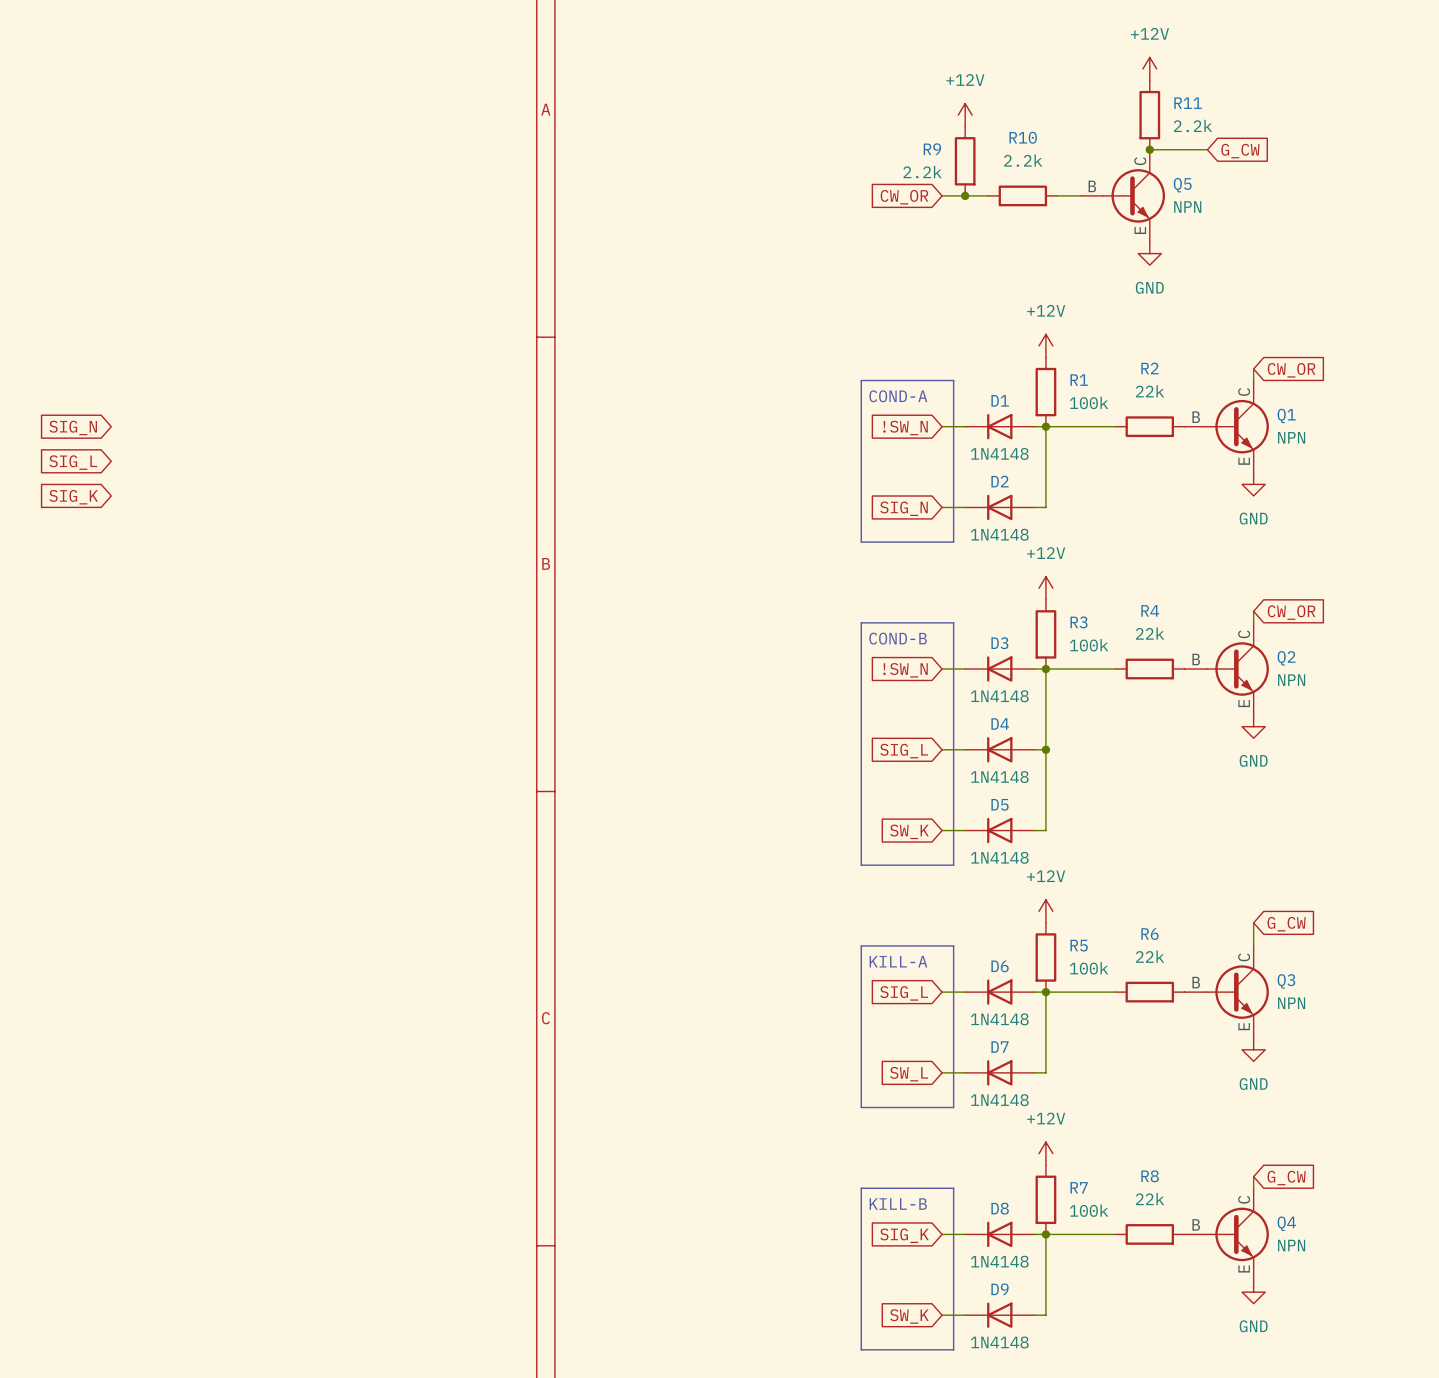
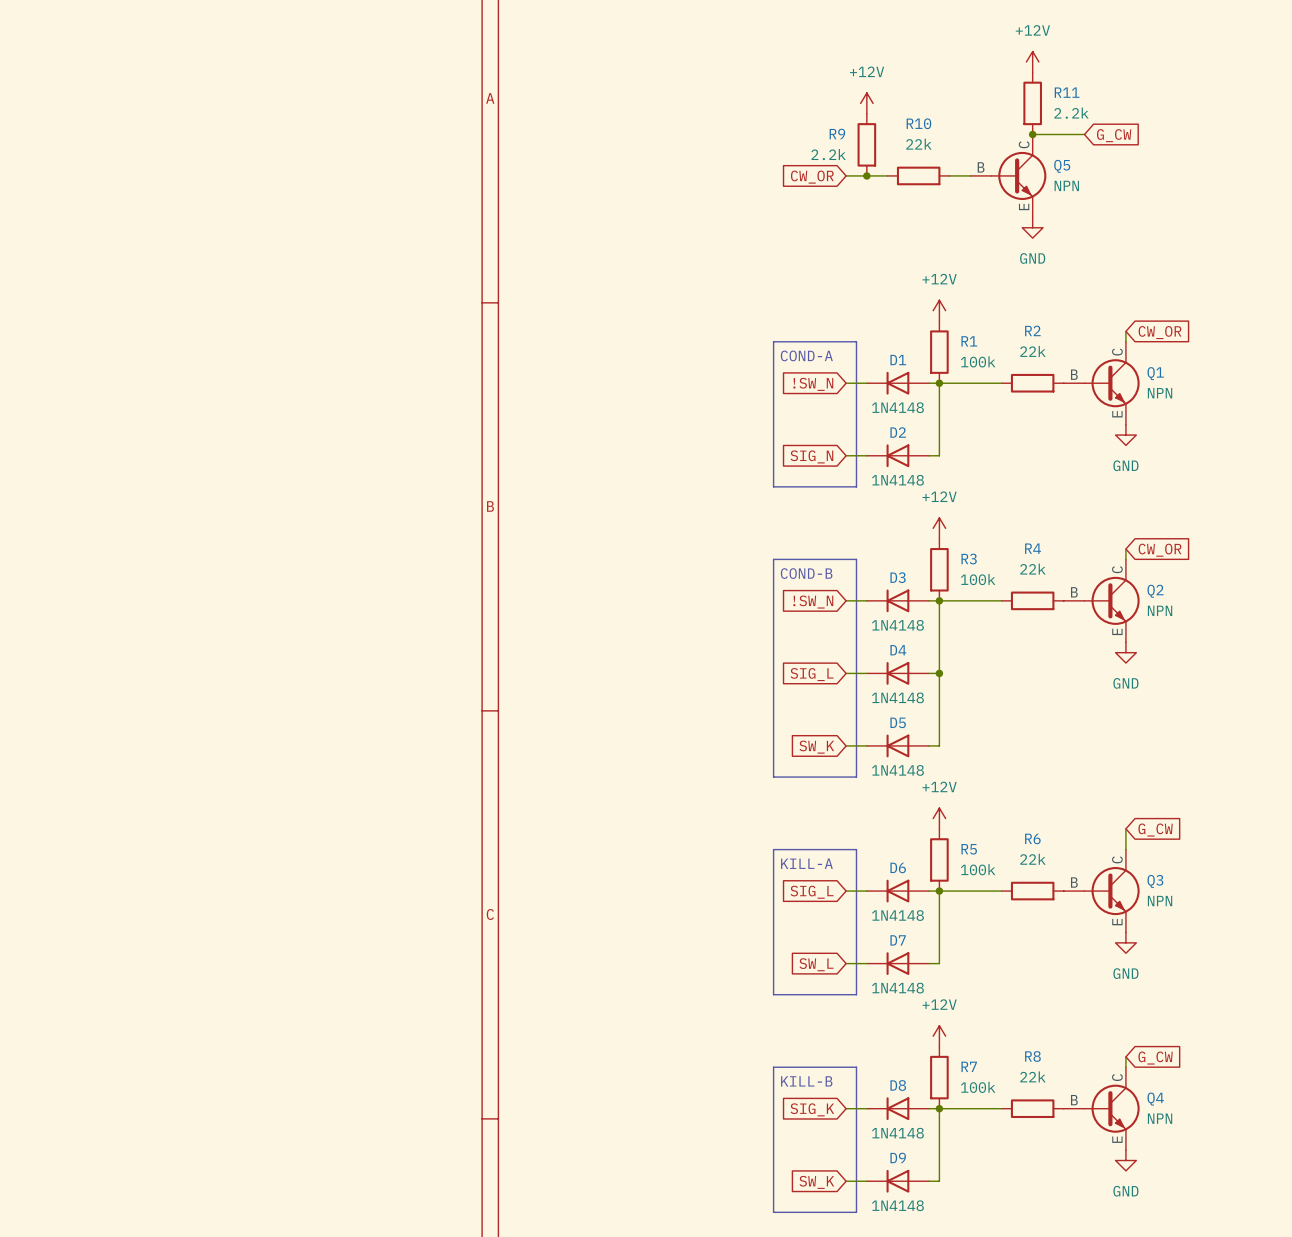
R10 value: 2.2k (1023, 160) -> 22k (918, 144)
global label: SIG_N (73, 427) -> none
global label: SIG_L (73, 462) -> none
global label: SIG_K (73, 497) -> none

